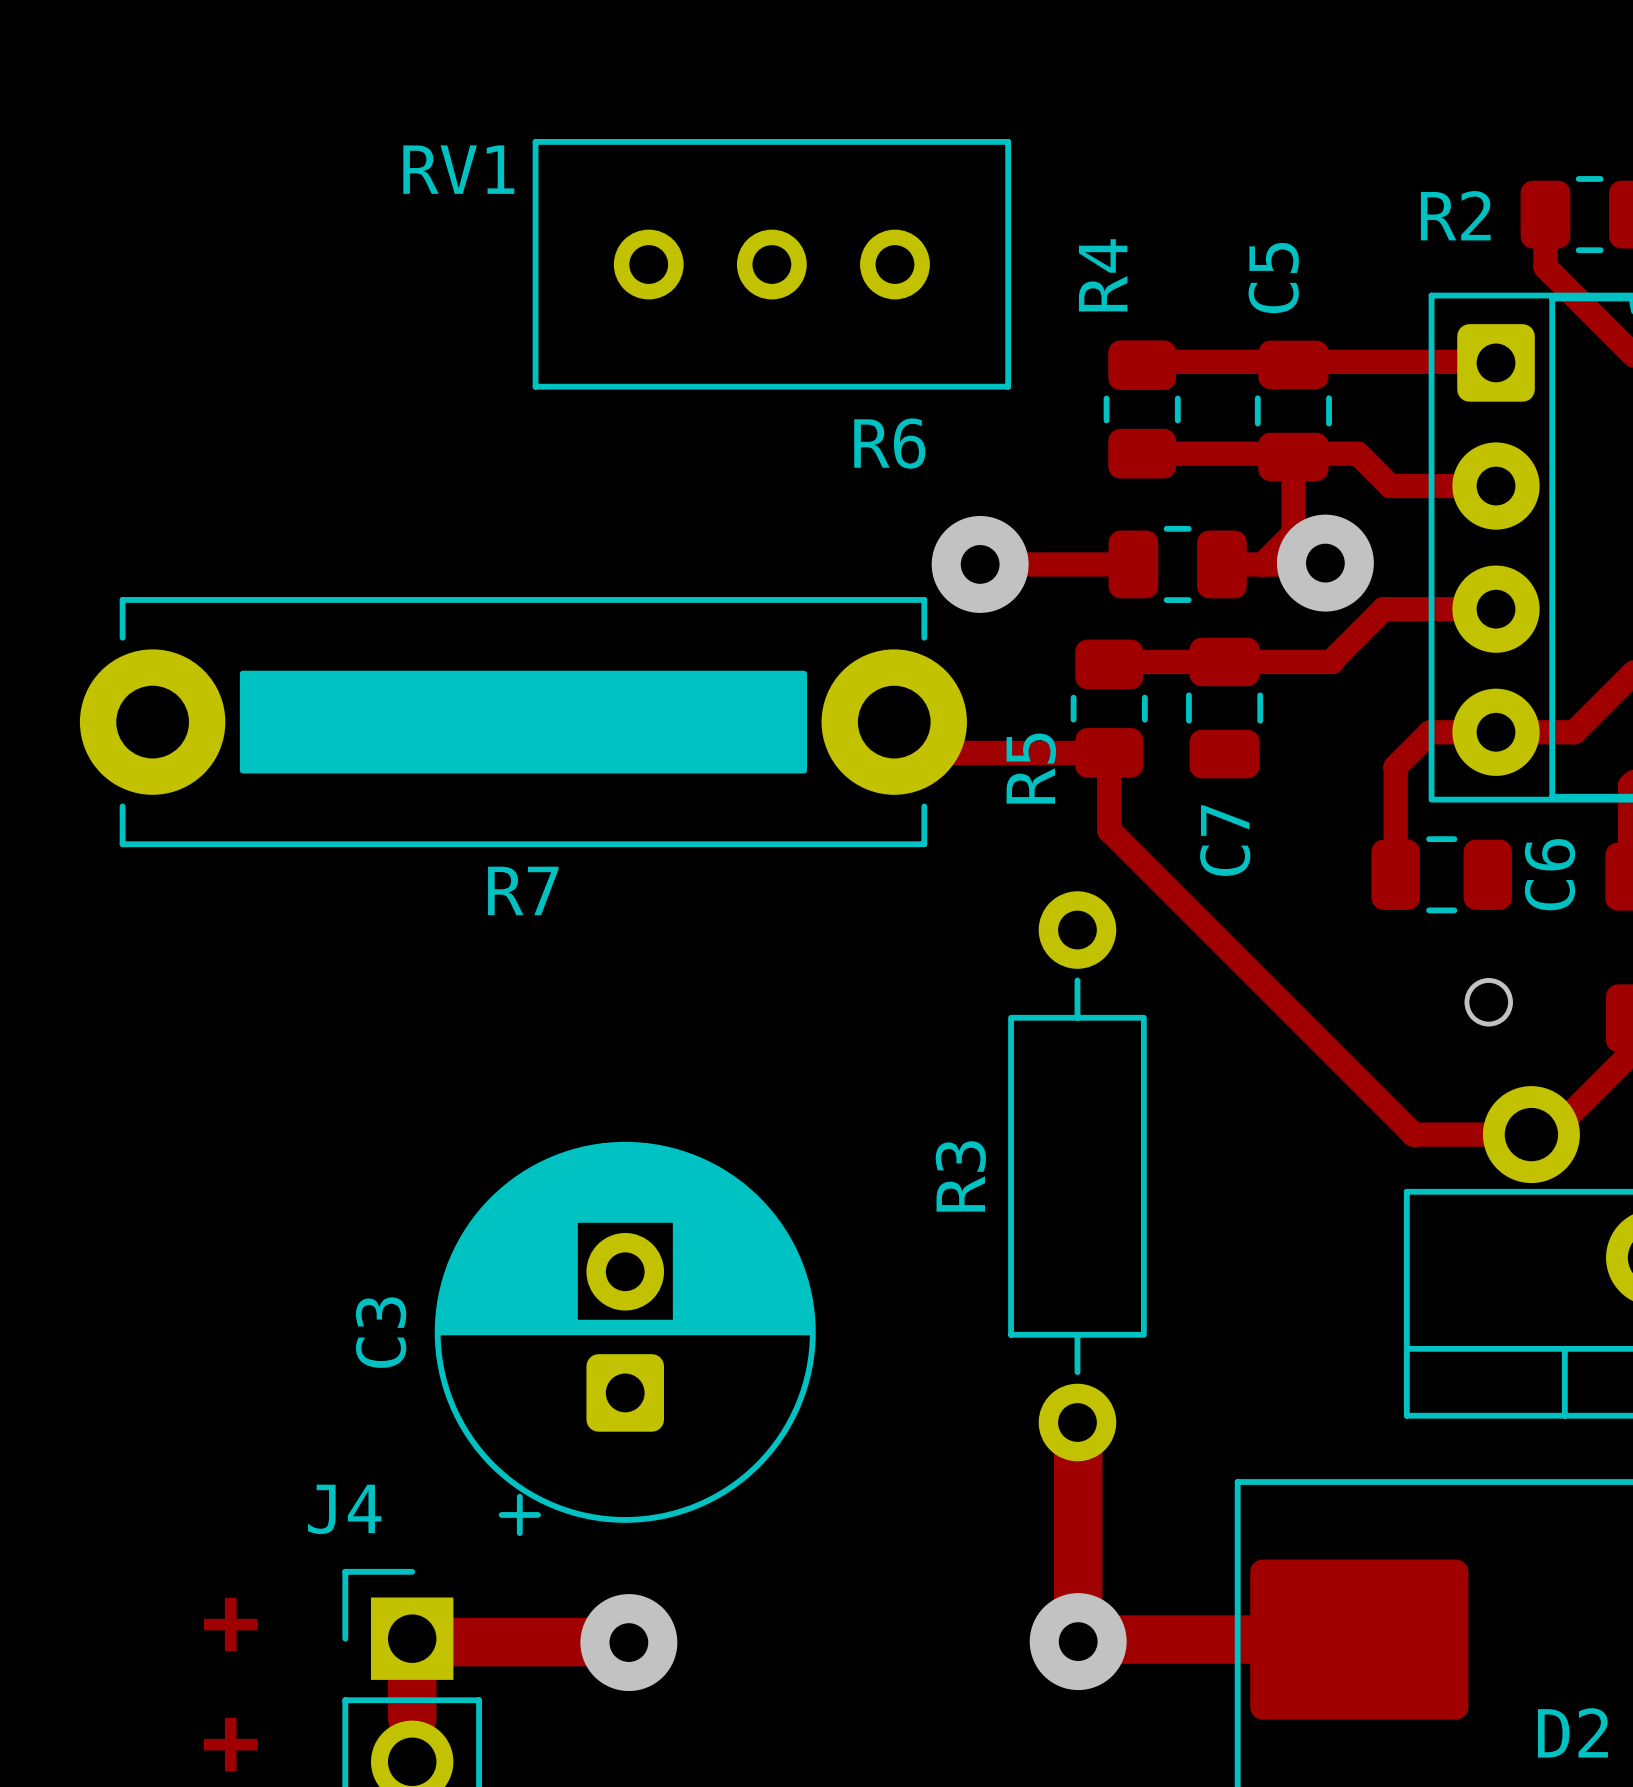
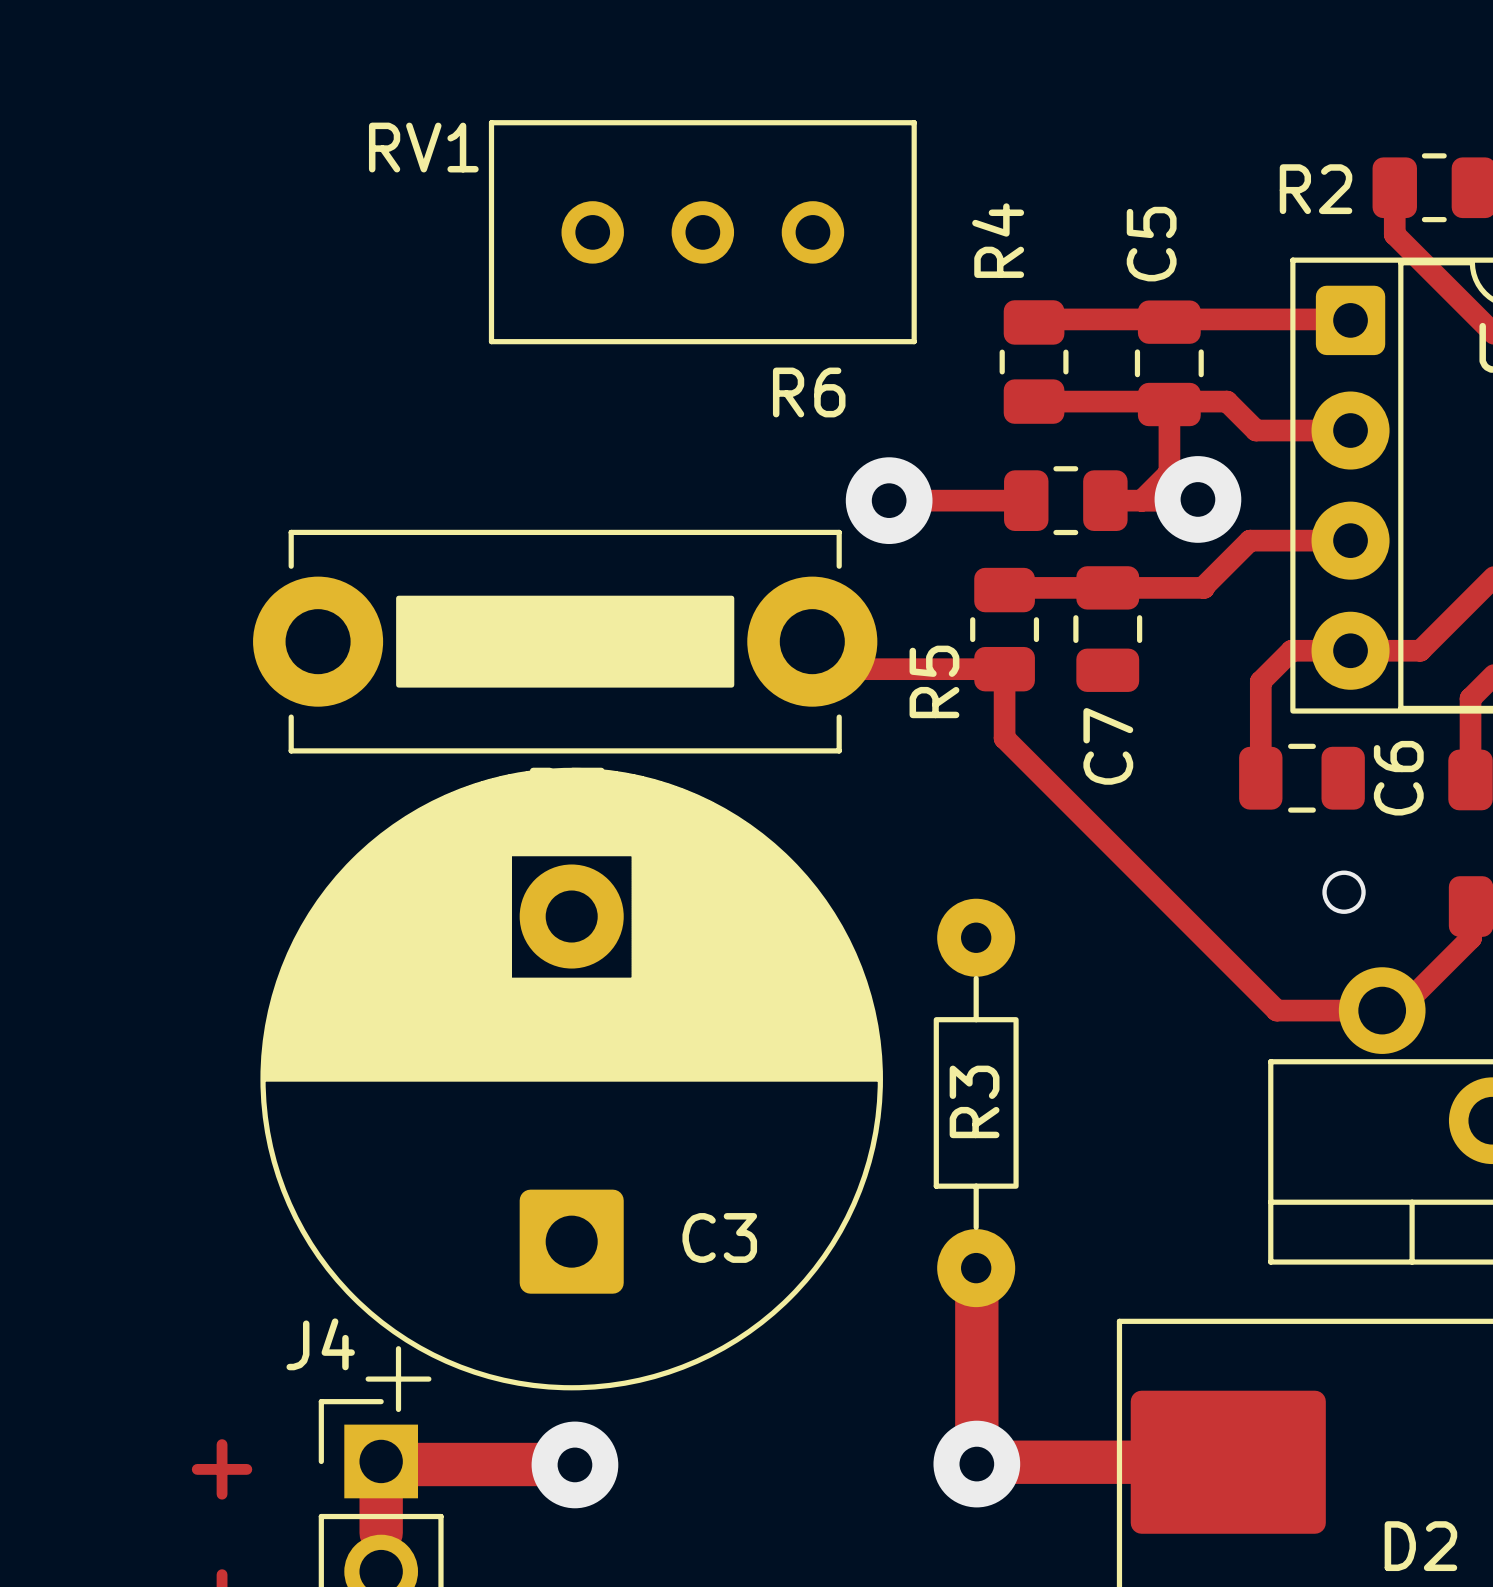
R7 footprint: [79, 597, 967, 848] -> [253, 529, 878, 754]
R3 footprint: [1008, 891, 1147, 1462] -> [933, 898, 1019, 1308]
C3 footprint: [434, 1141, 816, 1537] -> [260, 767, 883, 1413]
R3 name position: R3 (960, 1176) -> R3 (974, 1101)
C3 name position: C3 (381, 1332) -> C3 (719, 1237)

